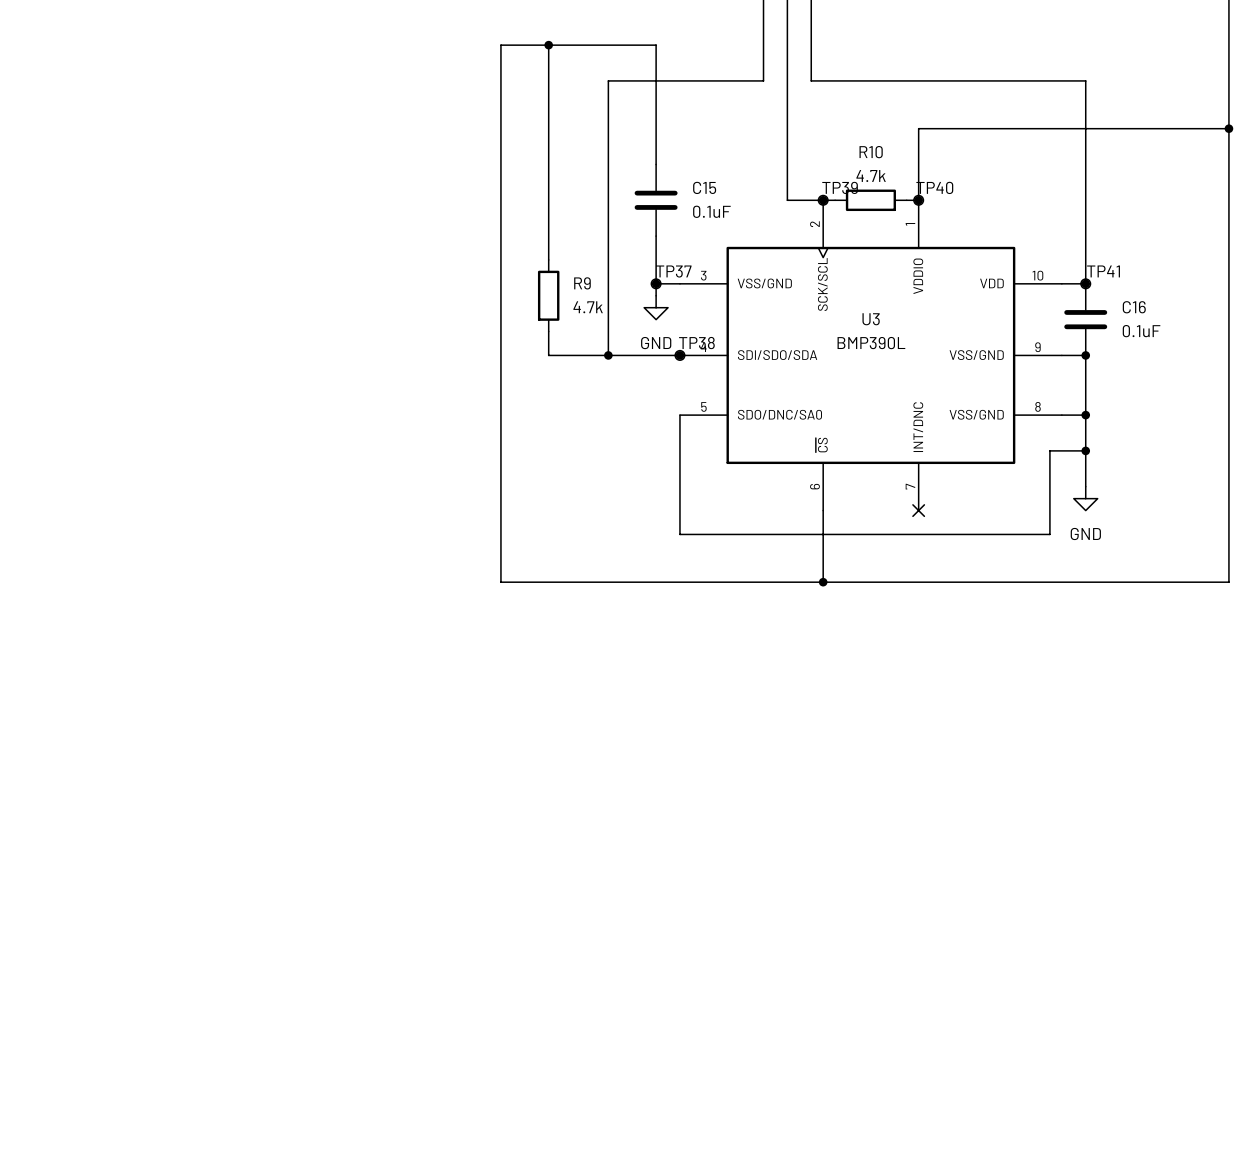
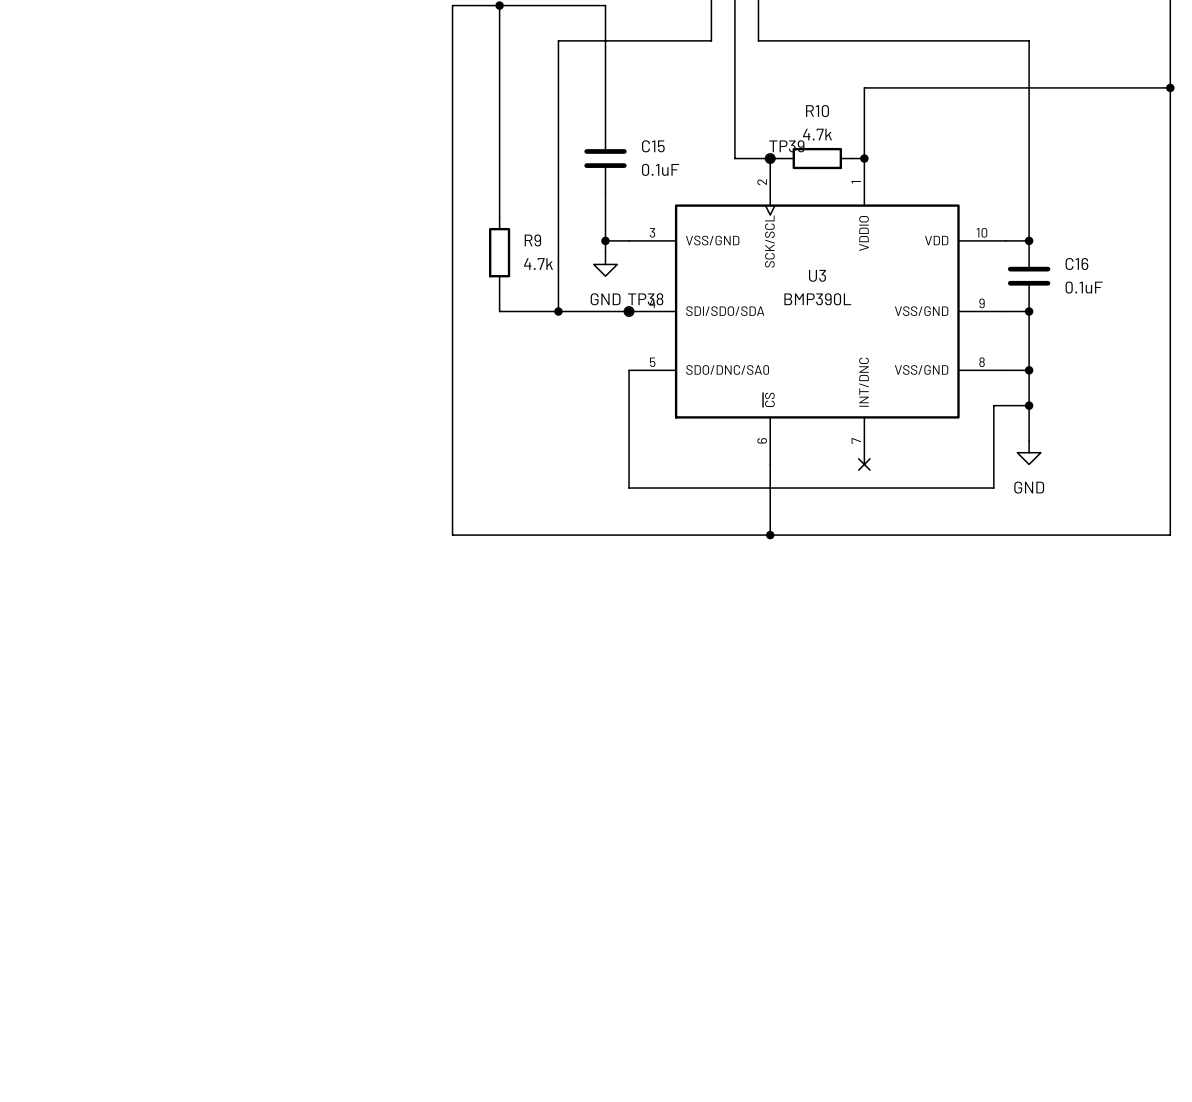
TP40: (918, 200) -> none
TP37: (656, 283) -> none
TP41: (1085, 283) -> none

